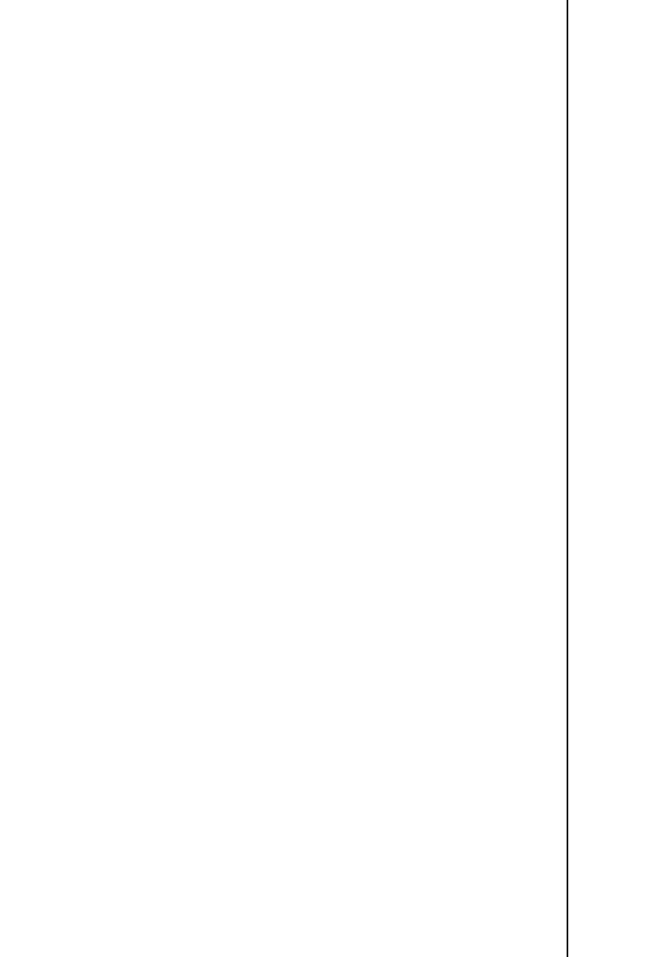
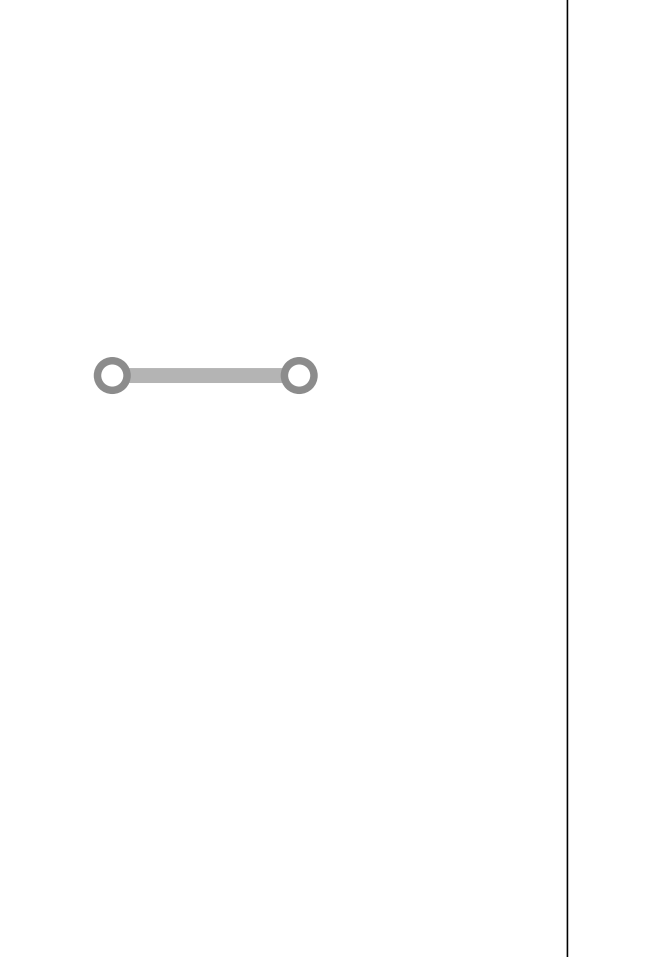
track: none -> (112, 375) (299, 375)
via: none -> (112, 375)
via: none -> (299, 375)

